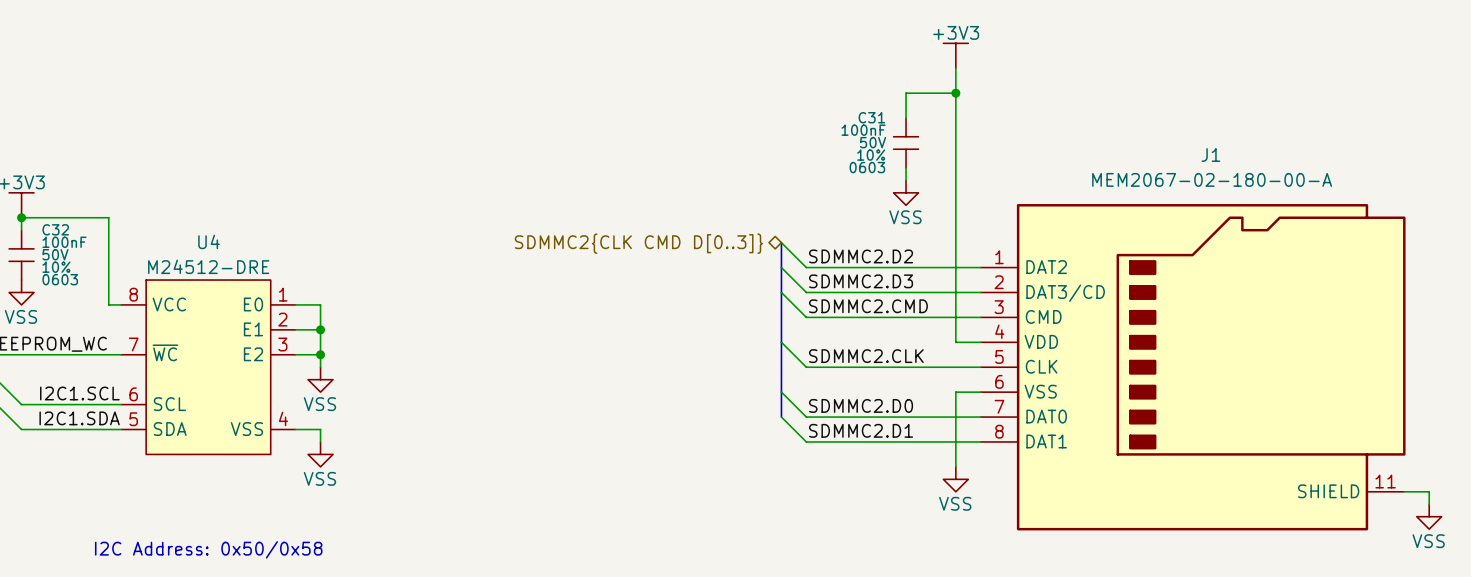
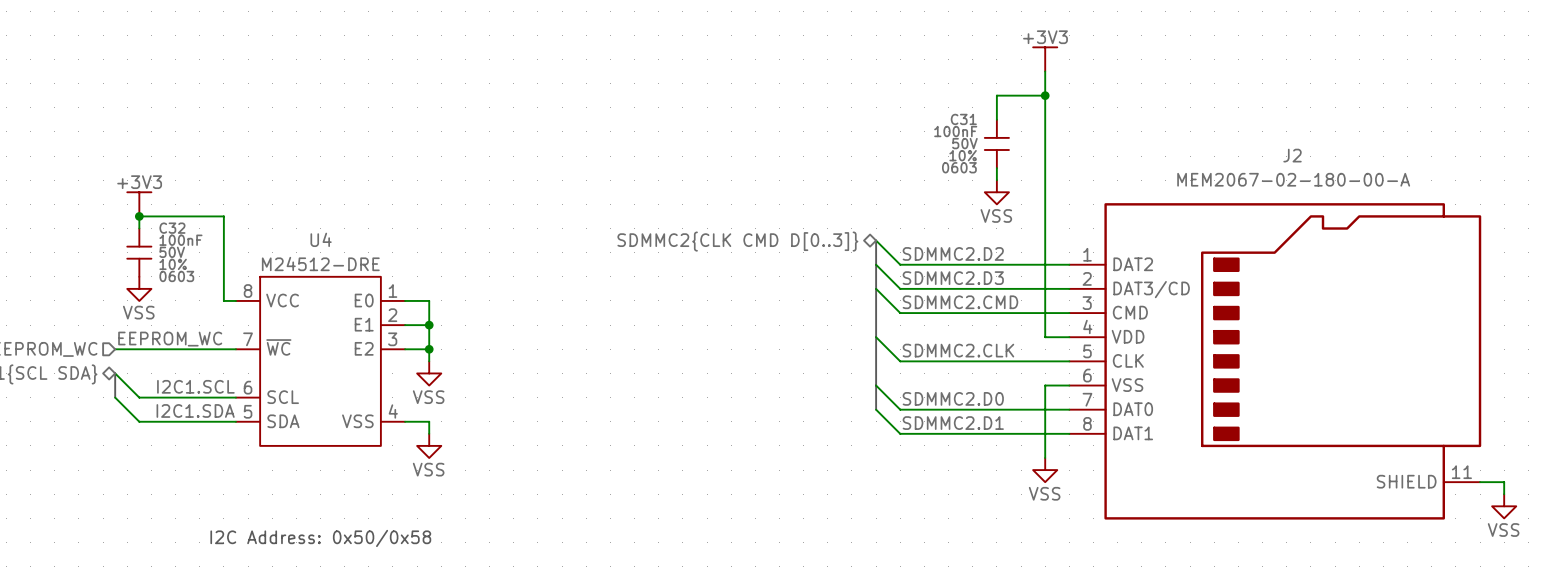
J1 name: J1 (1210, 154) -> J2 (1292, 155)

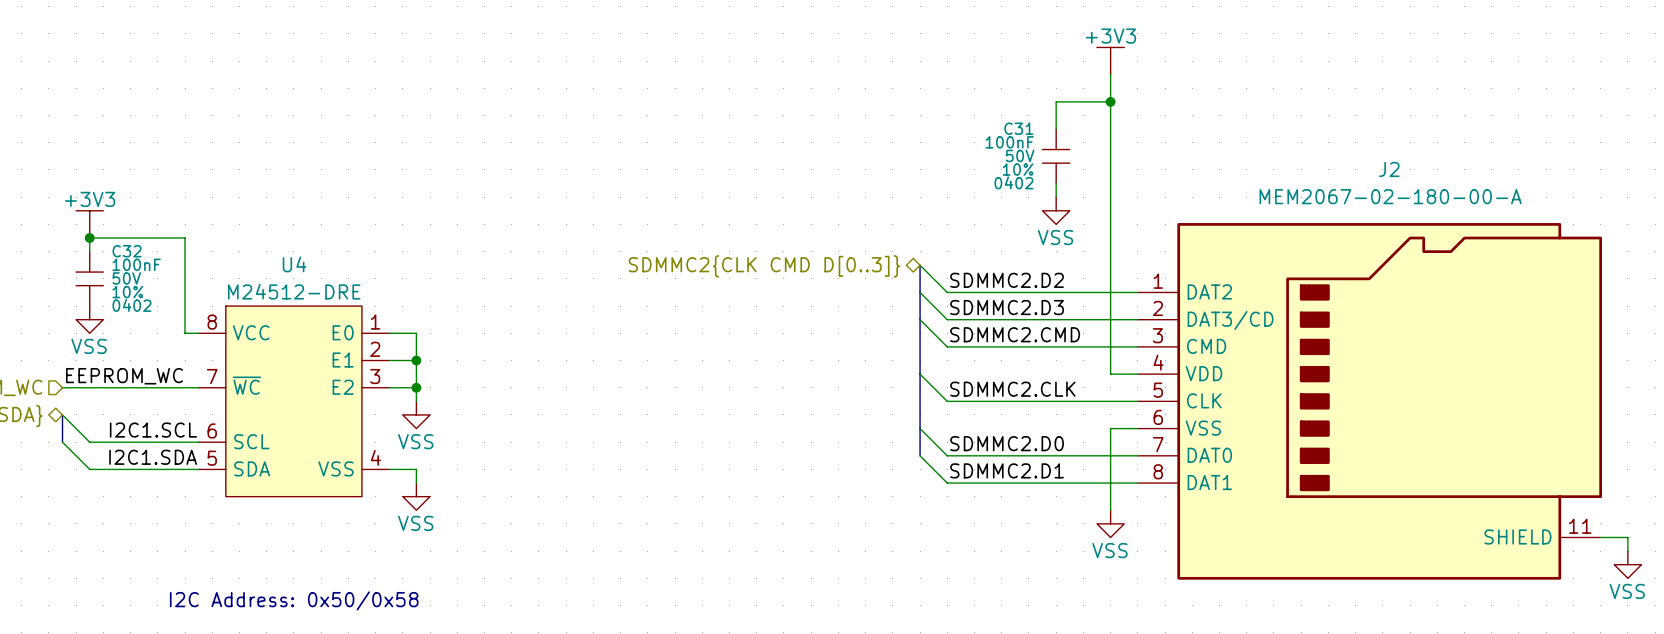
C31 text: 0603 (959, 167) -> 0402 (1013, 182)
C32 text: 0603 (176, 276) -> 0402 (131, 305)

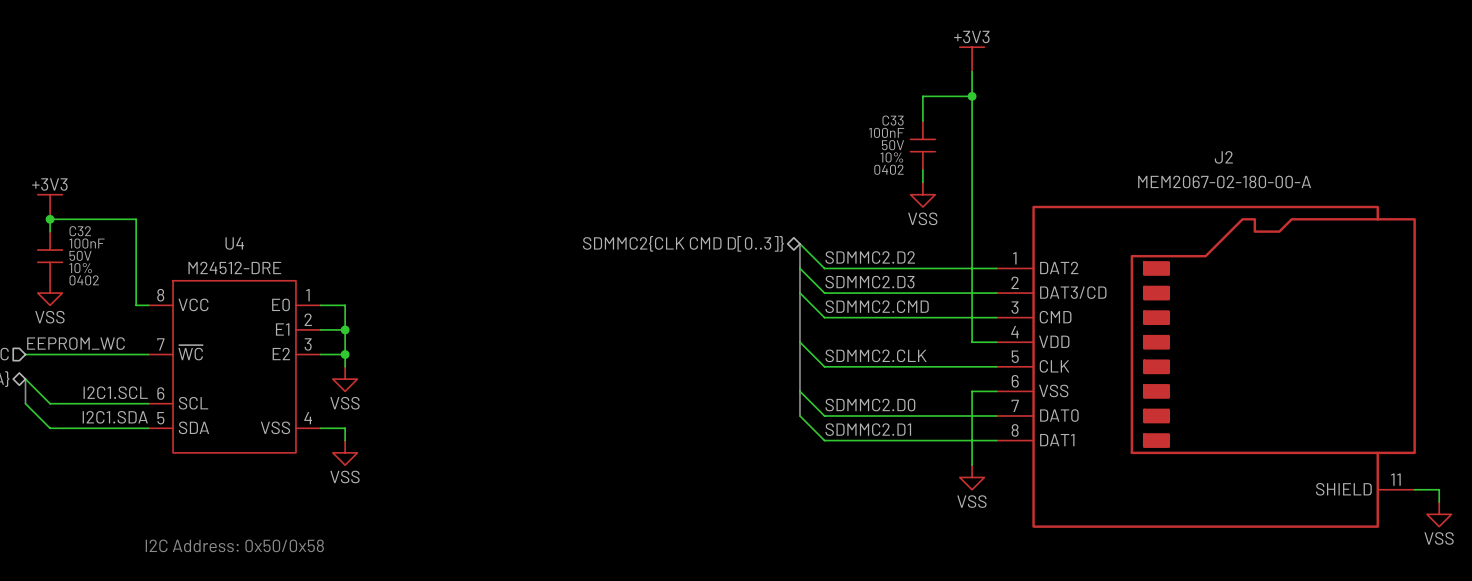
C31 name: C31 (1018, 128) -> C33 (893, 120)

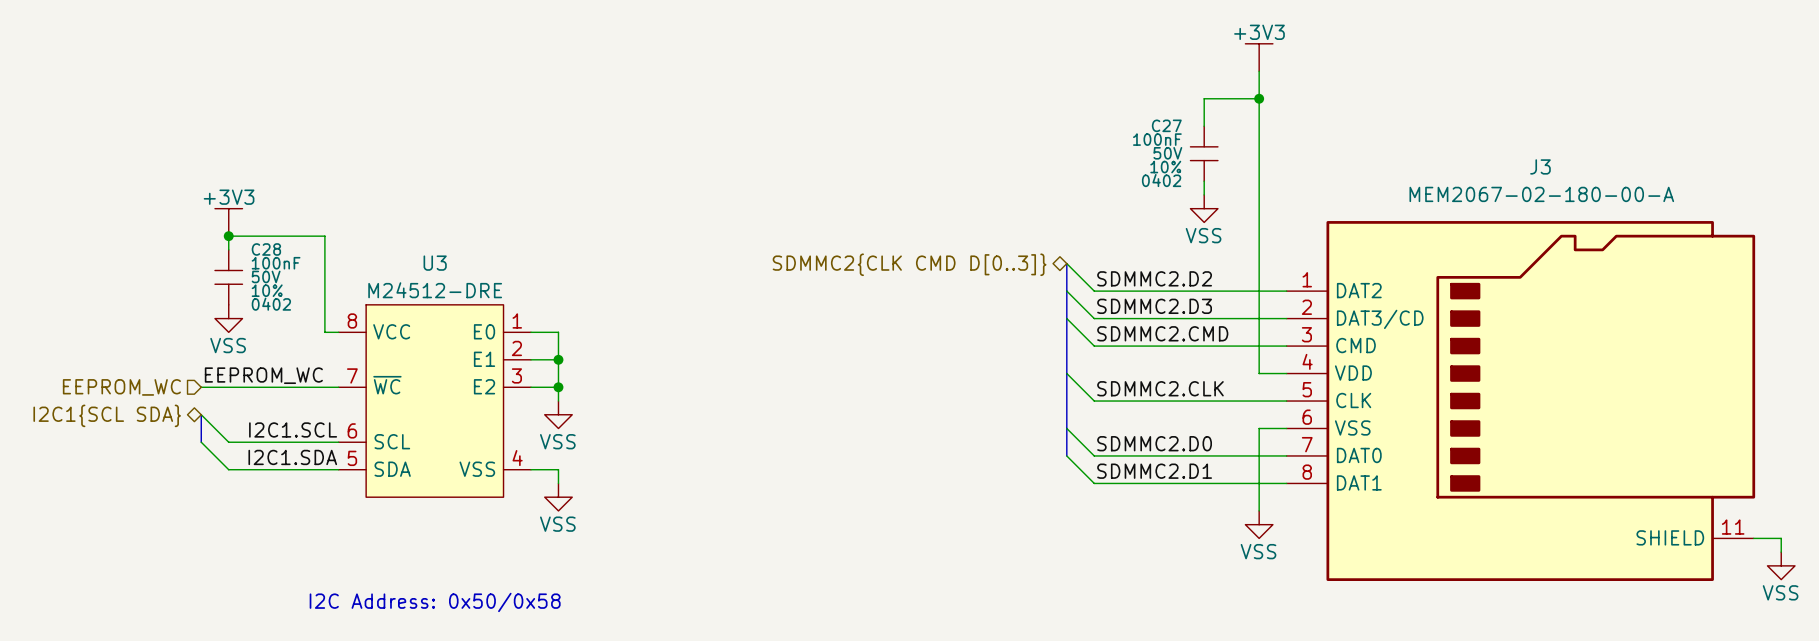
C33 name: C33 (893, 120) -> C27 (1166, 125)
J2 name: J2 (1223, 157) -> J3 (1540, 166)
C32 name: C32 (80, 231) -> C28 (266, 249)
U4 name: U4 (234, 243) -> U3 (435, 263)

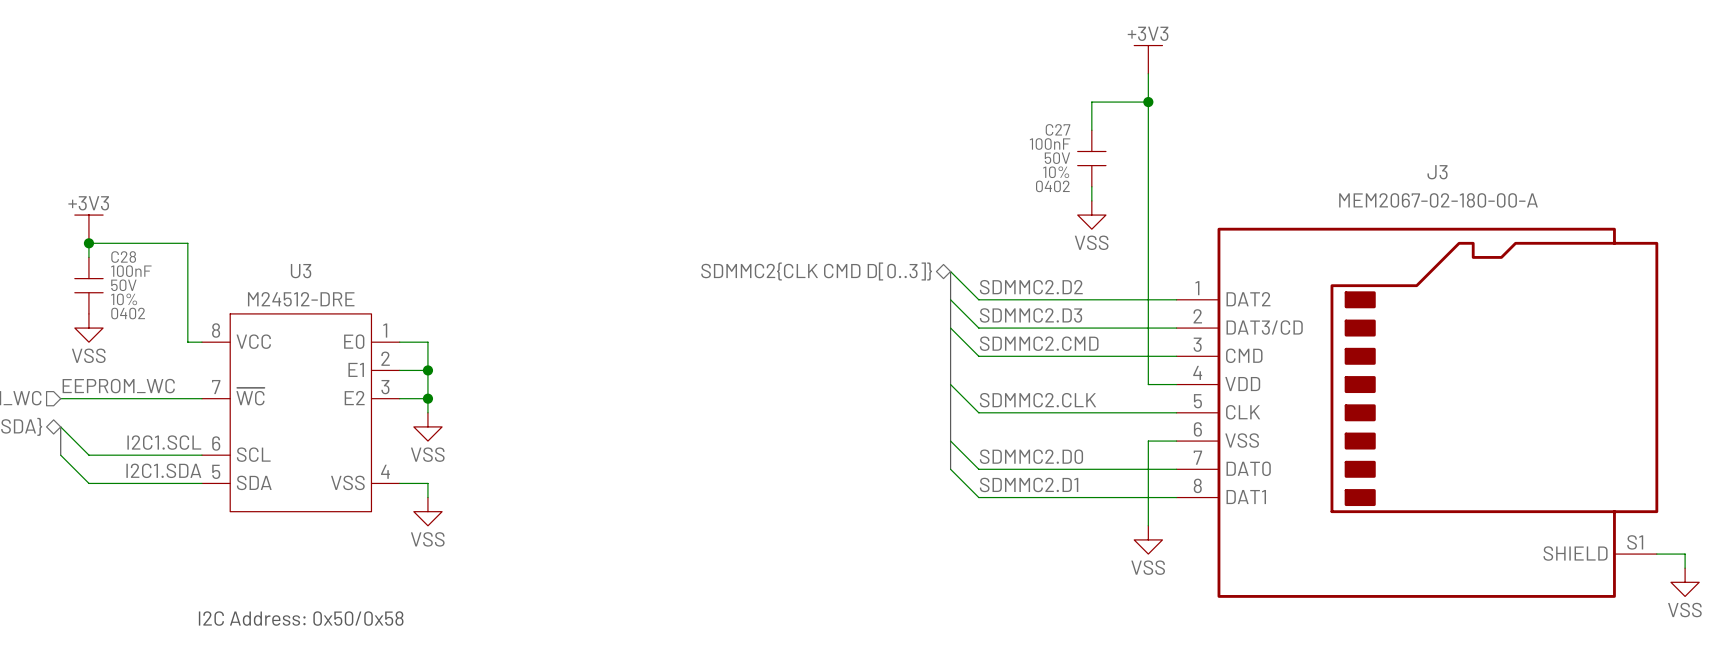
J3 pin number: 11 (1733, 527) -> S1 (1635, 542)

